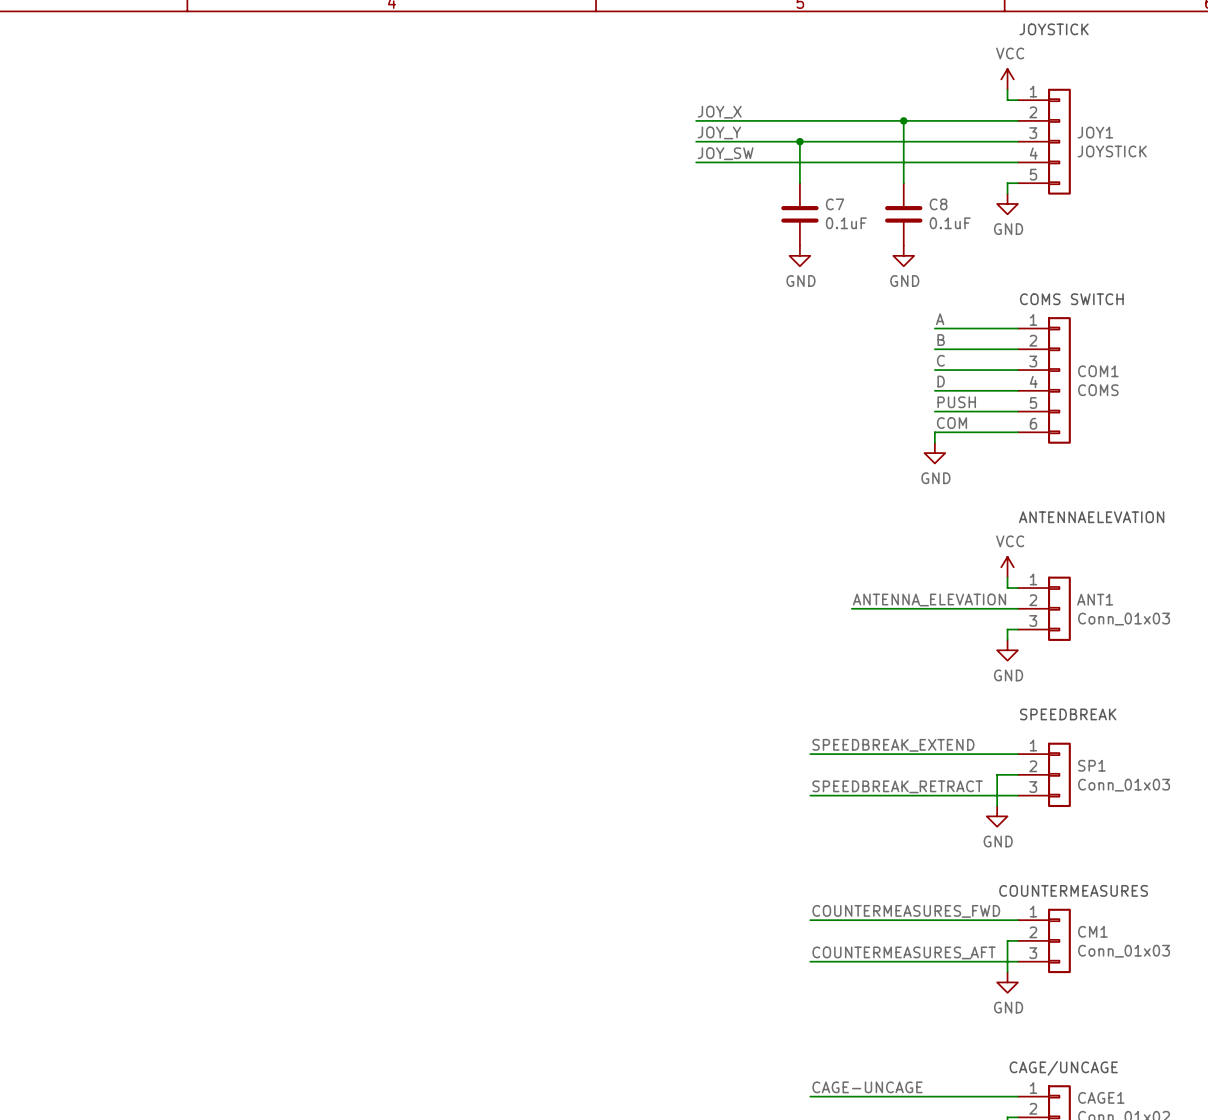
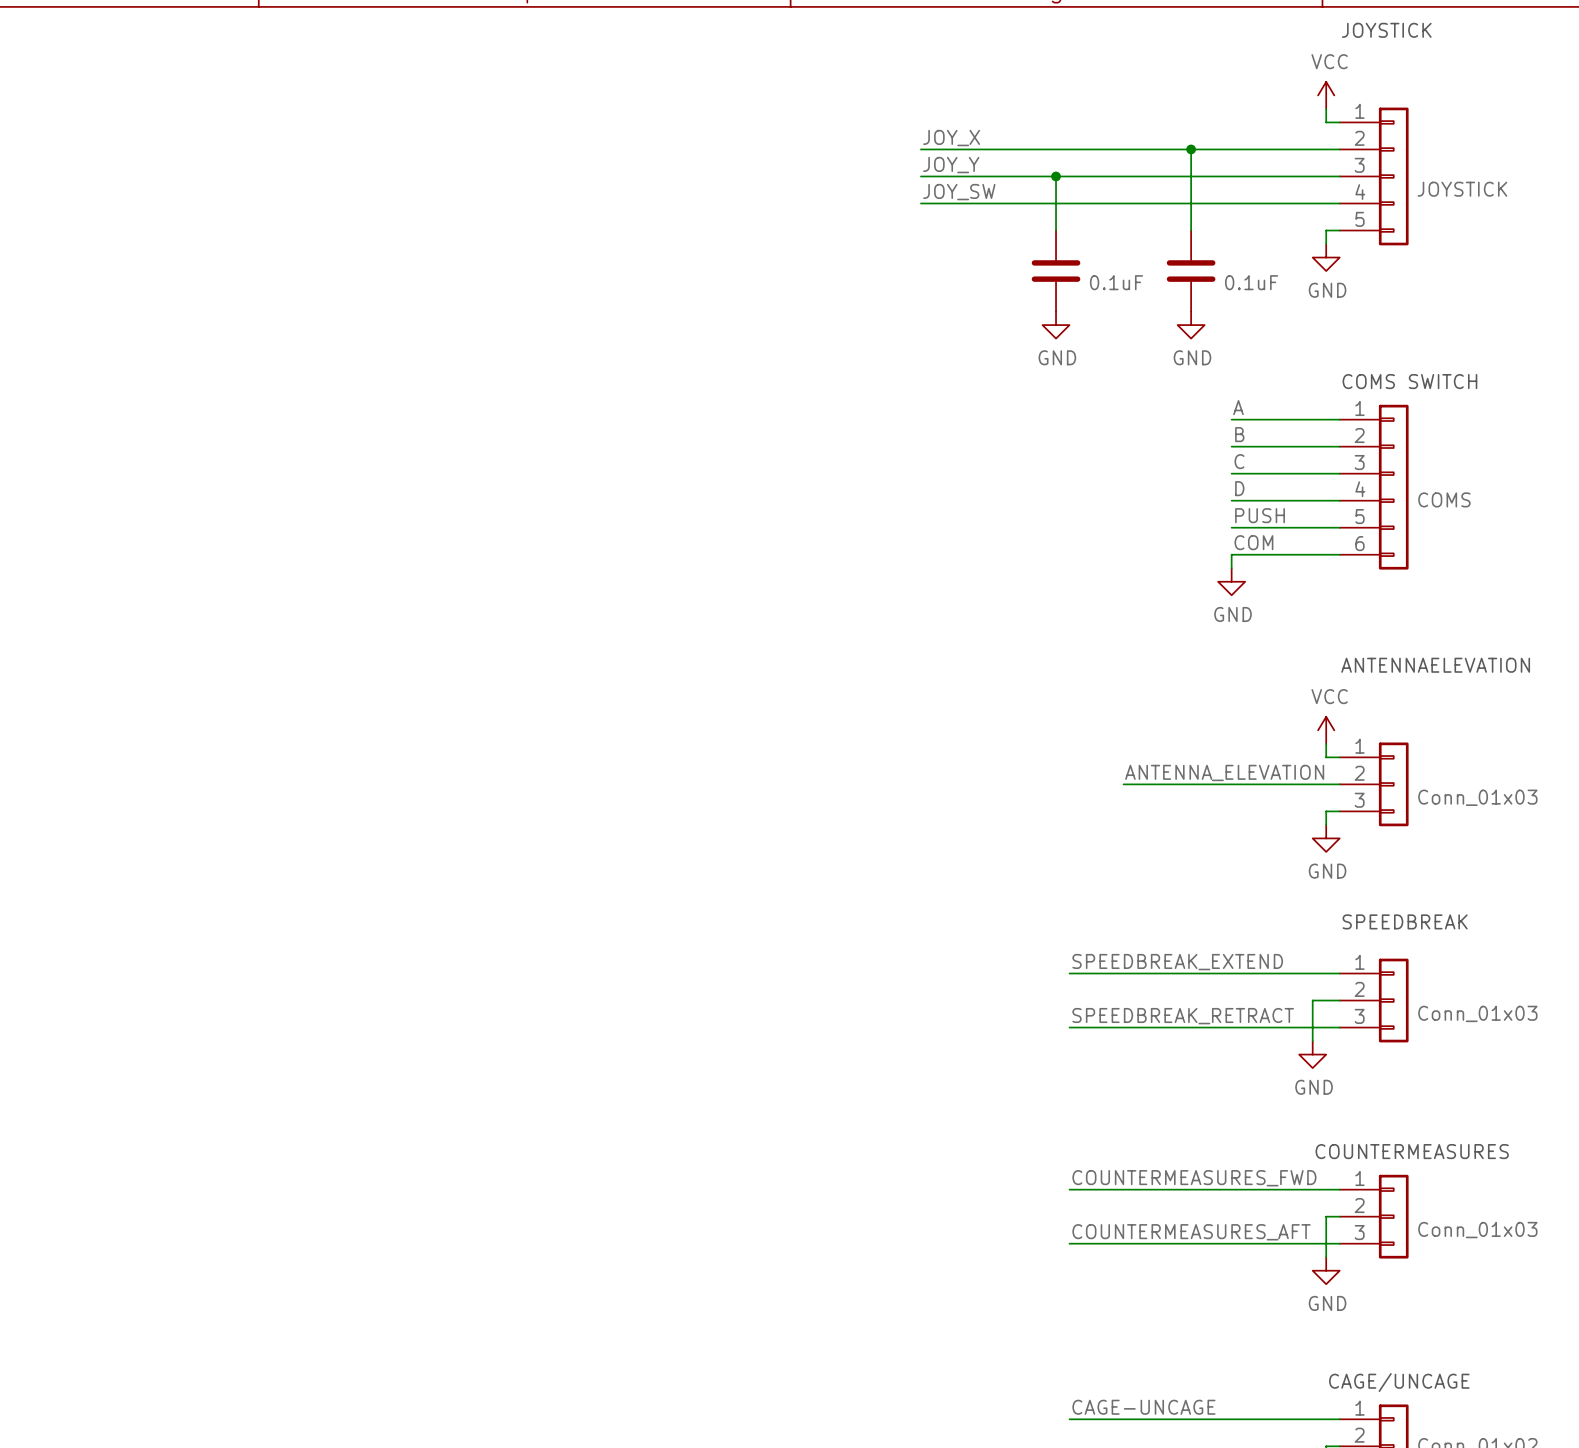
JOY1 name: JOY1 (1095, 132) -> none
C7 name: C7 (835, 204) -> none
C8 name: C8 (938, 204) -> none
COM1 name: COM1 (1098, 371) -> none
ANT1 name: ANT1 (1095, 599) -> none
SP1 name: SP1 (1091, 765) -> none
CM1 name: CM1 (1092, 931) -> none
CAGE1 name: CAGE1 (1101, 1097) -> none

